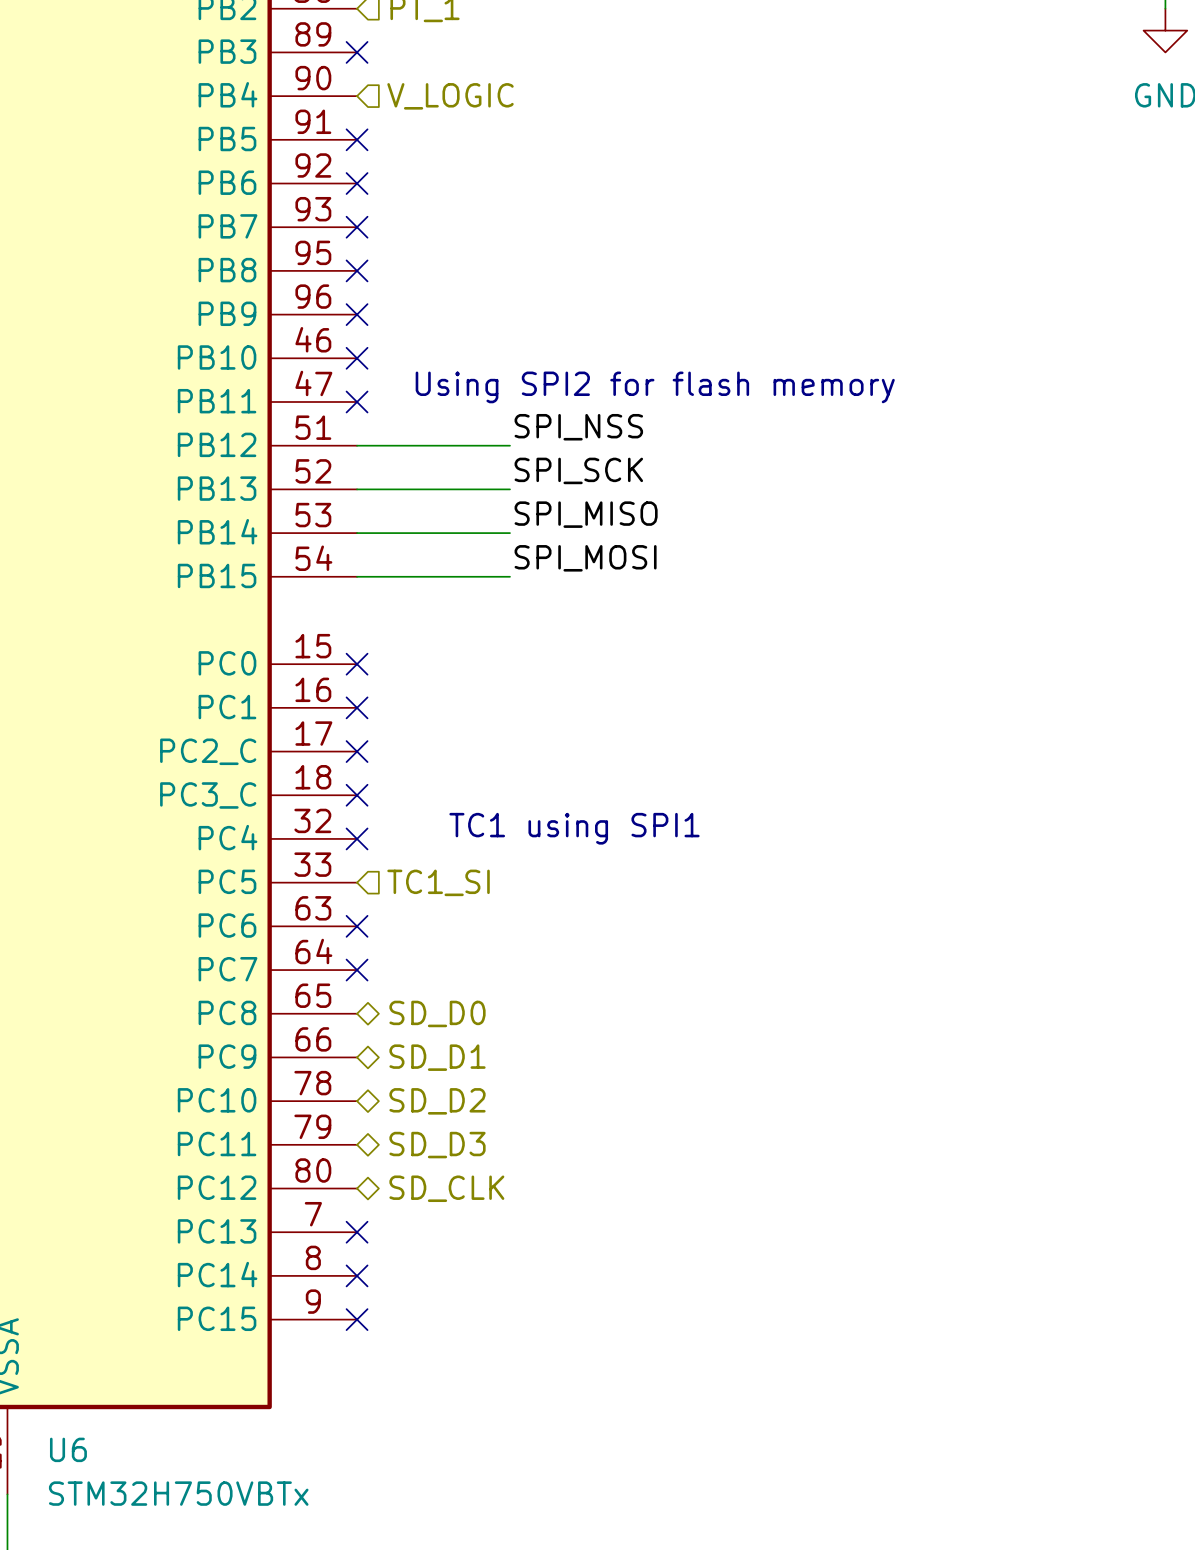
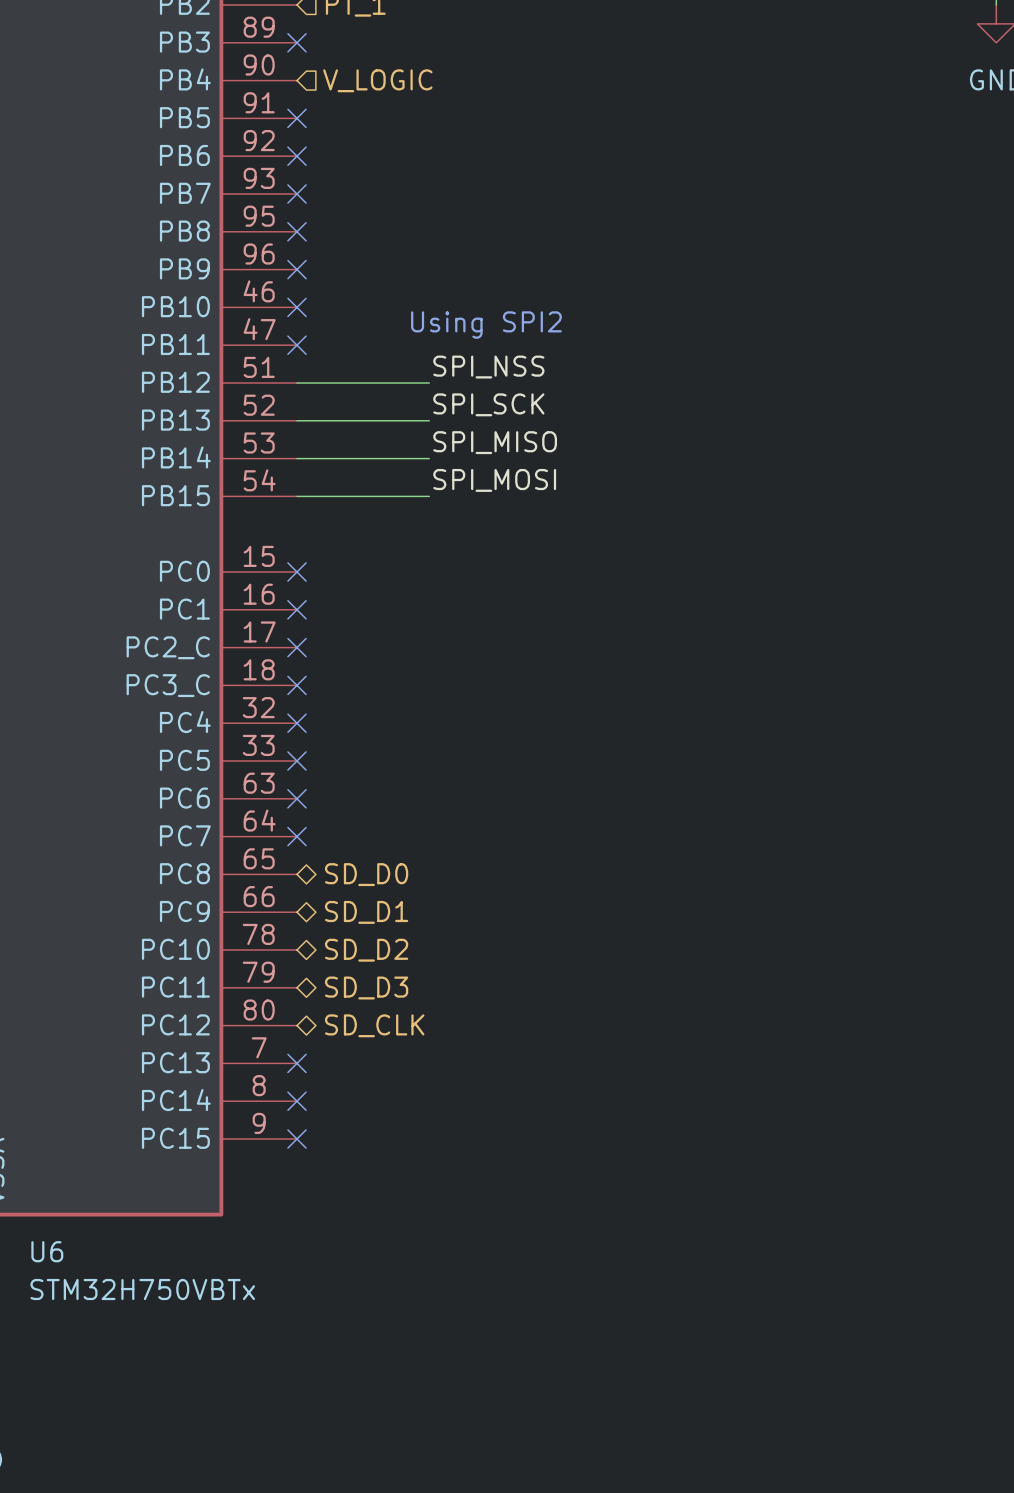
text: none -> Using SPI2 (486, 325)
text: Using SPI2 for flash memory (655, 387) -> none
text: TC1 using SPI1 (574, 828) -> none
no-connect mark: none -> (296, 761)
hierarchical label: TC1_SI (438, 882) -> none

